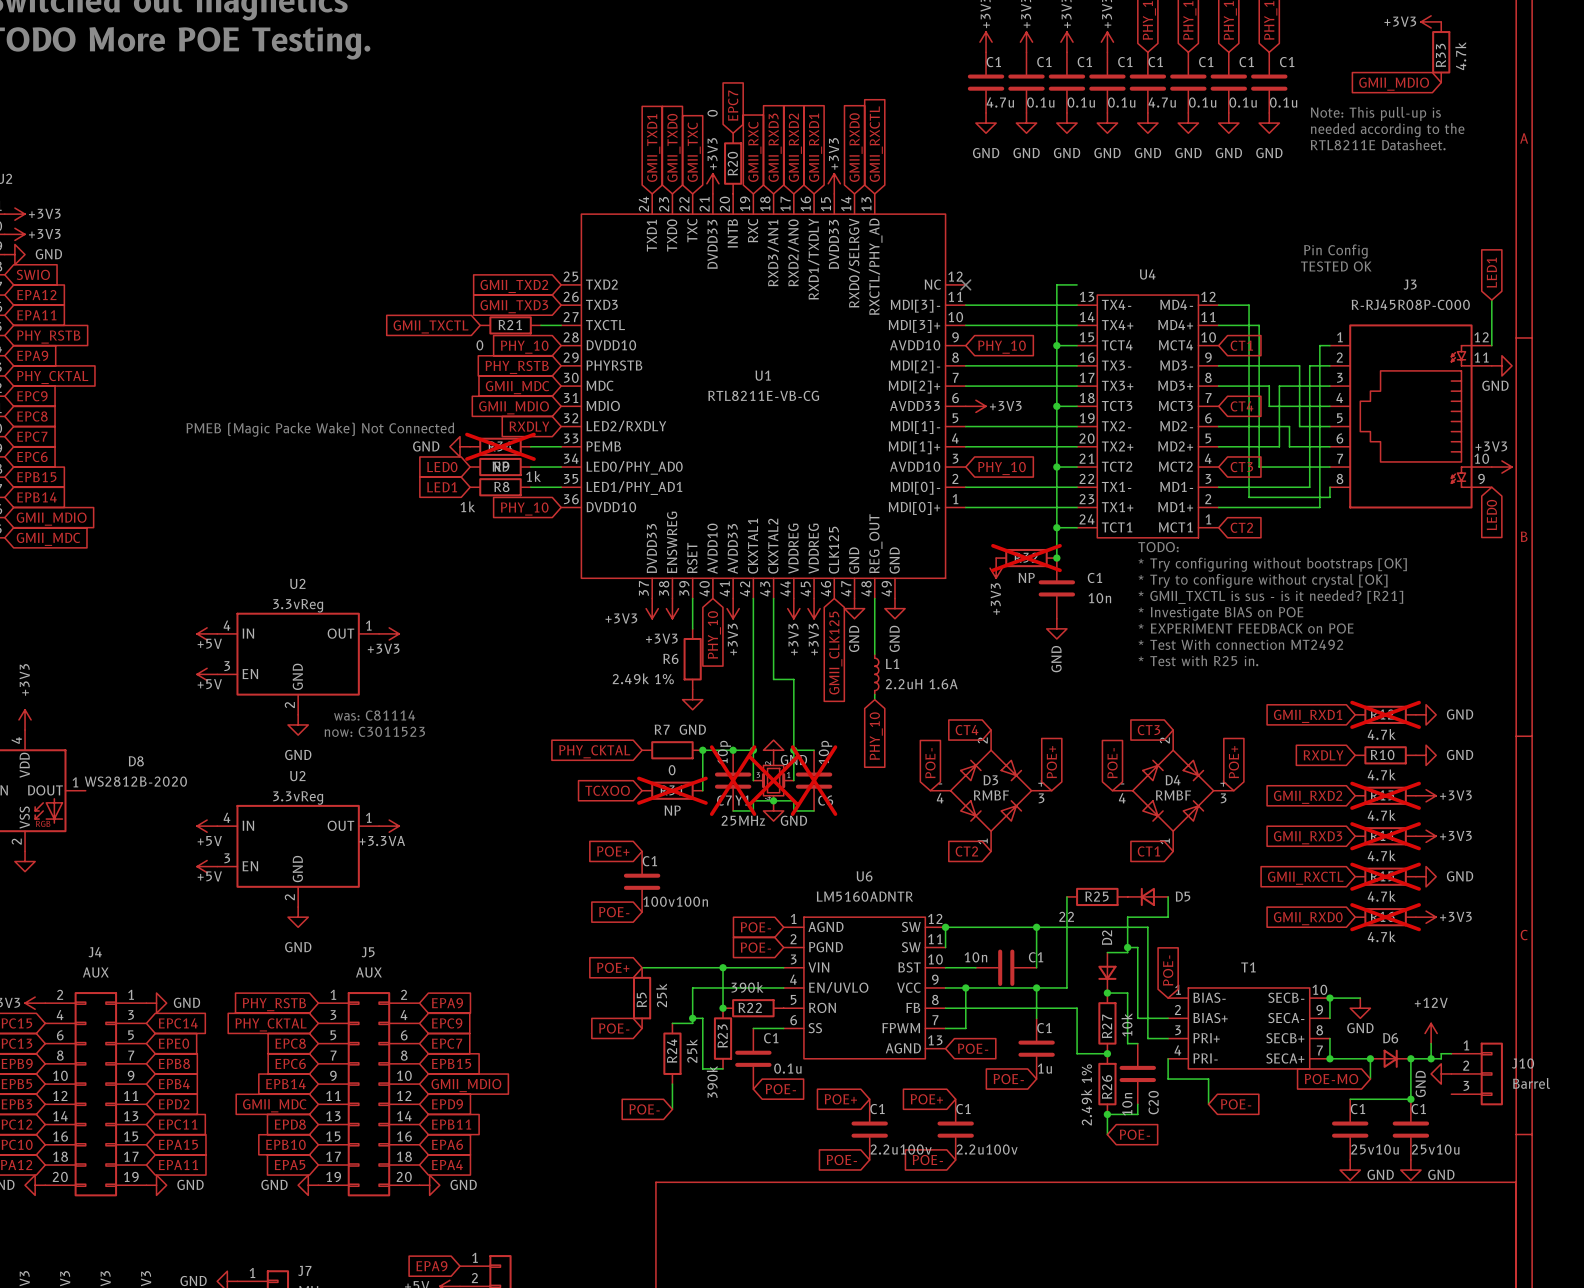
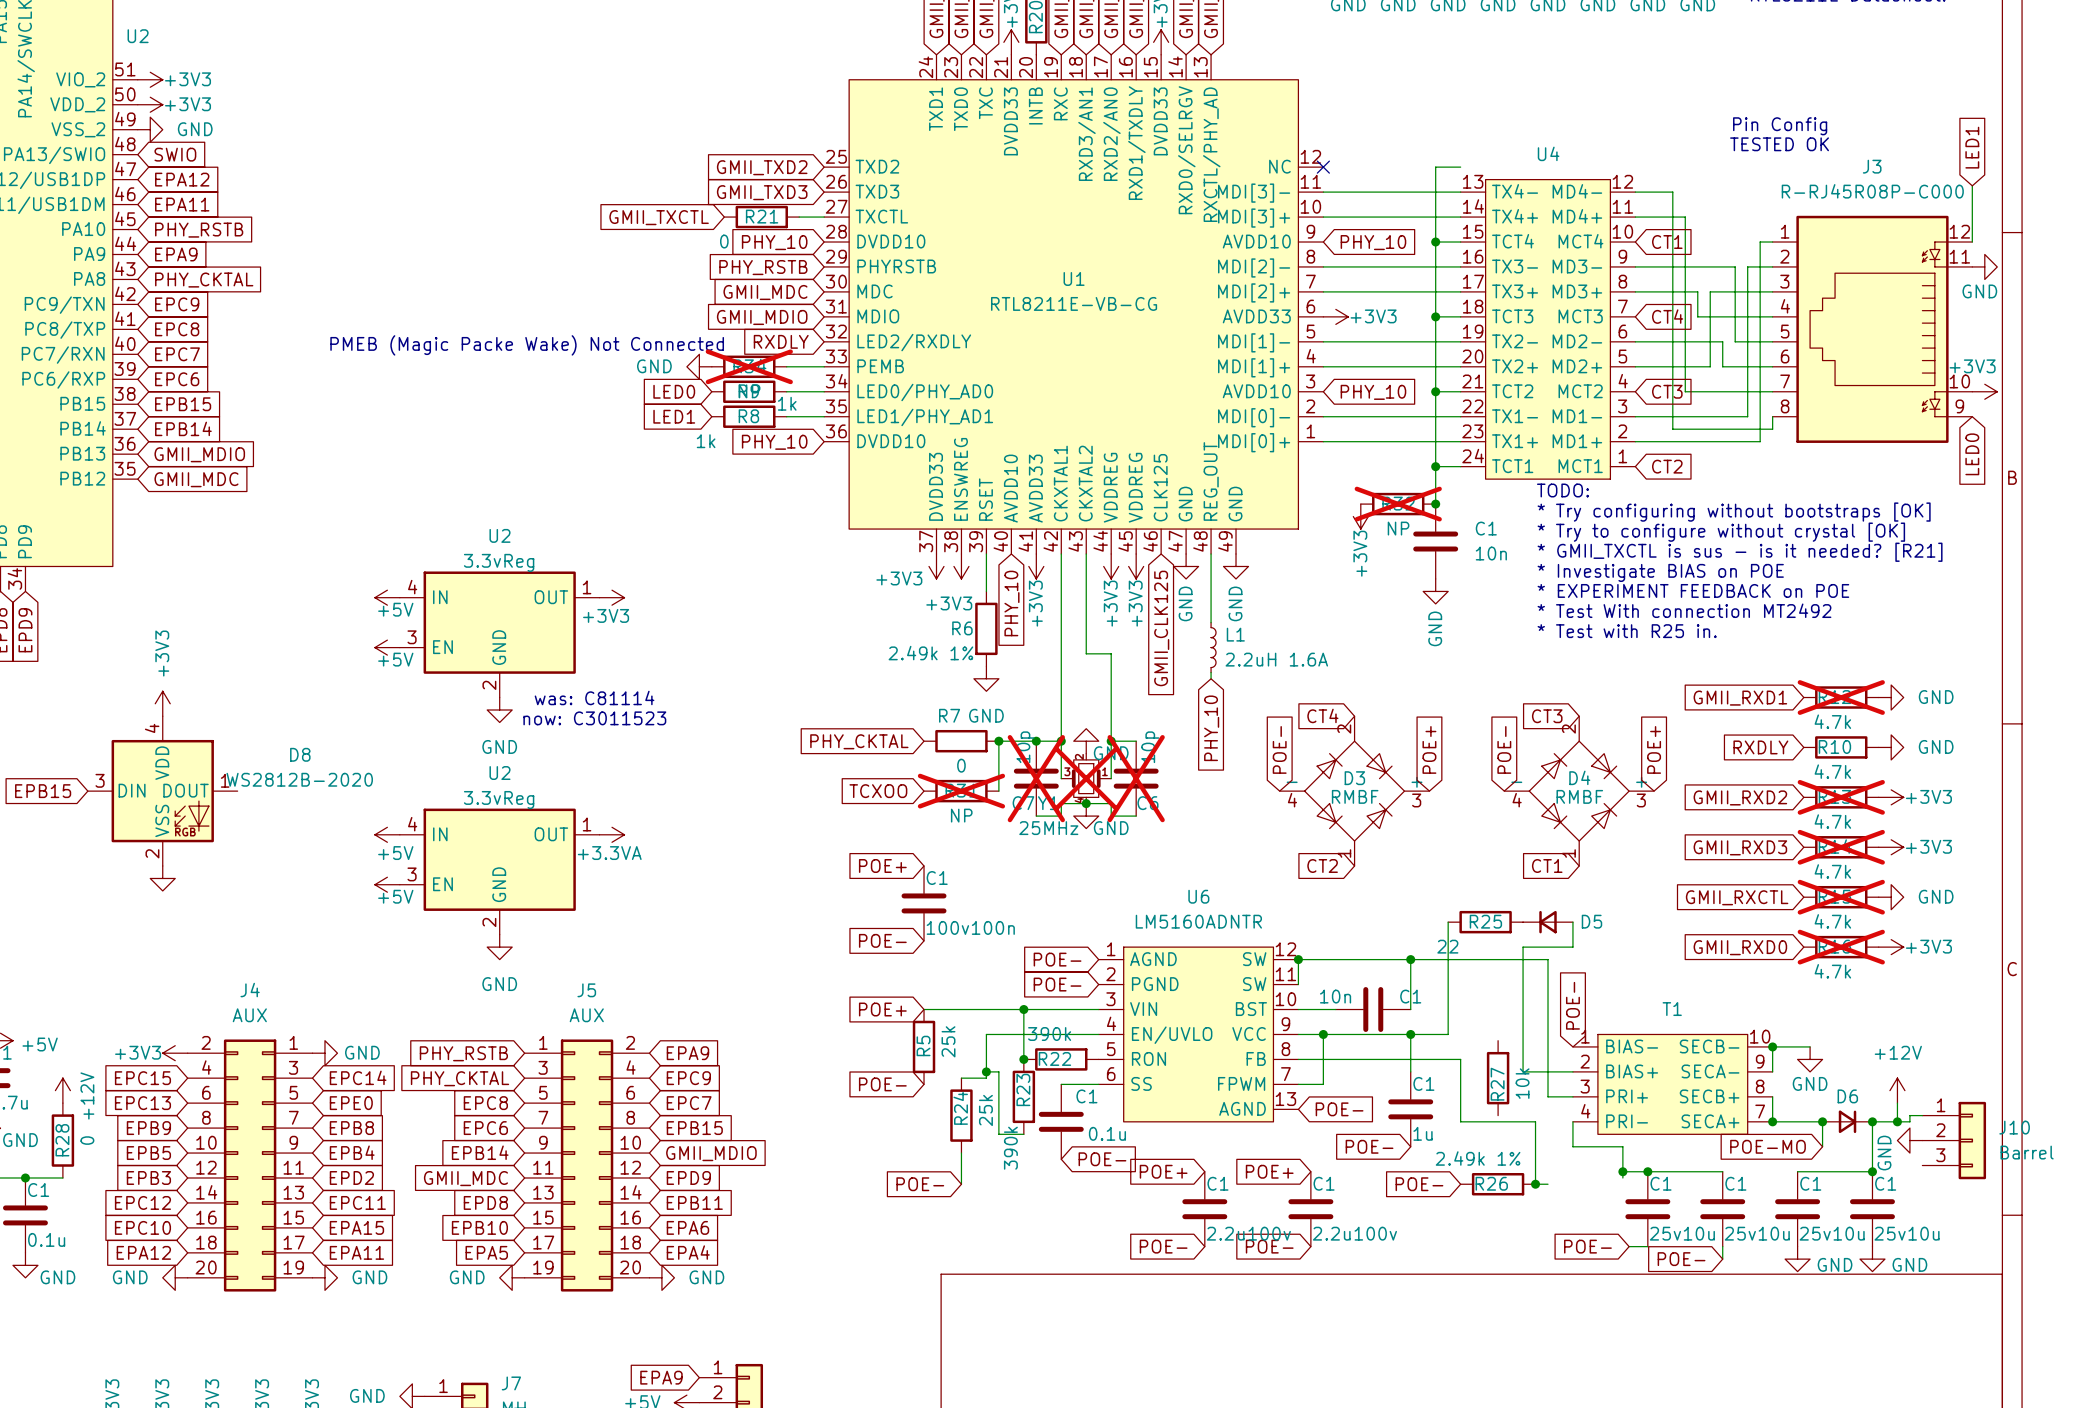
wire: (1127, 947) (1137, 947) (1137, 1018) -> none
junction: (1127, 947) -> none
wire: (1107, 952) (1127, 952) -> (1523, 1040) (1523, 990)
D2: (1107, 972) -> none
wire: (1107, 993) (1127, 993) -> none
junction: (1107, 993) -> none
wire: (1127, 1018) (1127, 1043) (1137, 1043) -> (1523, 1071) (1535, 1071)
wire: (1077, 1053) (1107, 1053) -> (1460, 1115) (1460, 1121) (1535, 1121) (1535, 1177)
junction: (1107, 1053) -> none
C20: 10n (1137, 1073) -> none
R26 rotation: 0° (1107, 1084) -> 90° clockwise (1498, 1184)
wire: none -> (1622, 1171) (1722, 1171)
junction: none -> (1622, 1171)
junction: none -> (1647, 1171)
global label: POE- (1236, 1104) -> none
wire: (1137, 1109) (1137, 1114) (1107, 1114) (1107, 1134) -> (1535, 1184) (1548, 1184)
junction position: (1107, 1114) -> (1535, 1184)
C1: none -> 25v10u (1647, 1209)
C1: none -> 25v10u (1722, 1209)
global label rotation: 0° (1134, 1134) -> 180° (1419, 1184)
global label position: POE- (1134, 1134) -> POE- (1419, 1184)
wire: none -> (1629, 1246) (1647, 1246)
wire: none -> (1722, 1246) (1722, 1259)
global label: none -> POE- (1587, 1246)
global label: none -> POE- (1681, 1259)

